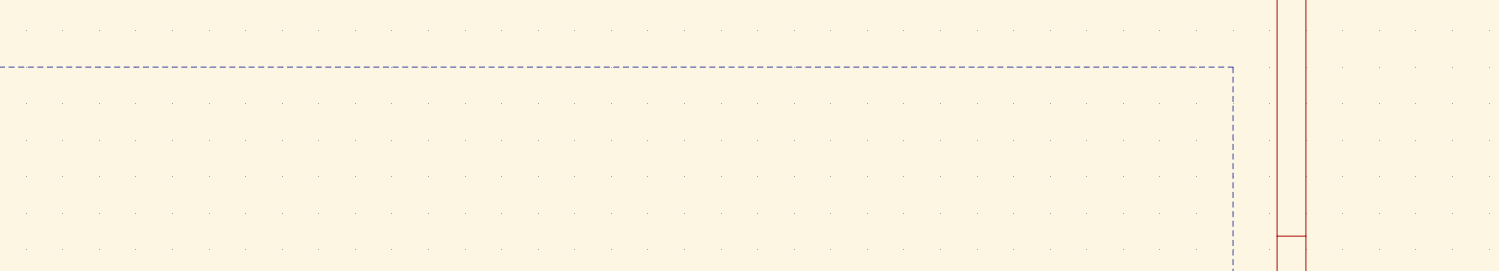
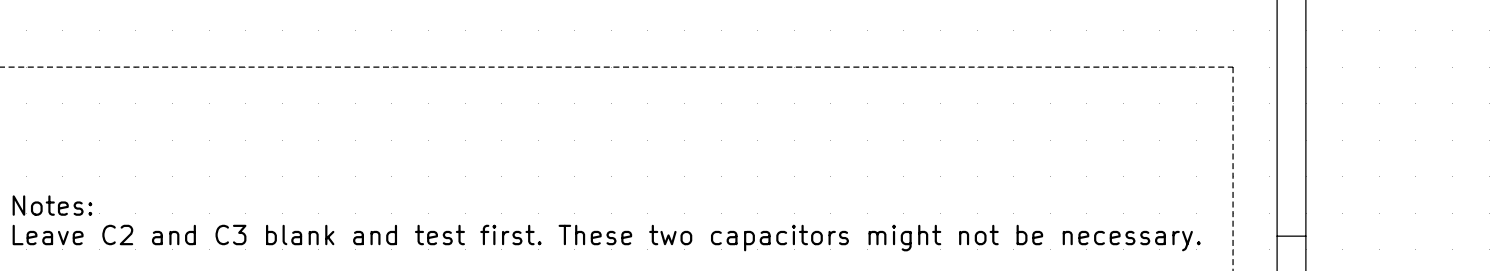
text: none -> Notes: (52, 205)
text: none -> Leave C2 and C3 blank and test first. These two capacitors might not be necessary. (606, 238)

